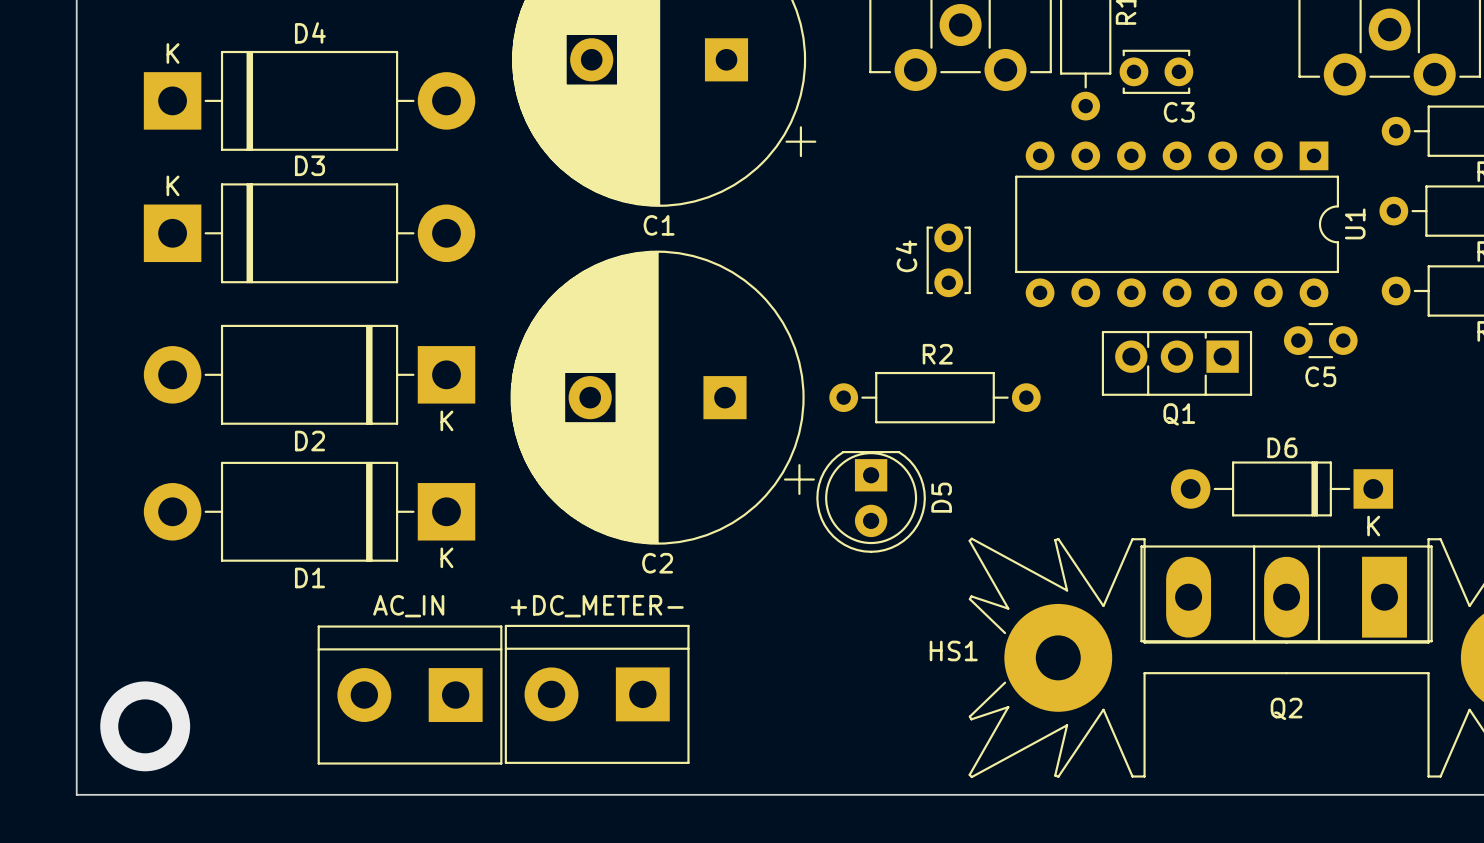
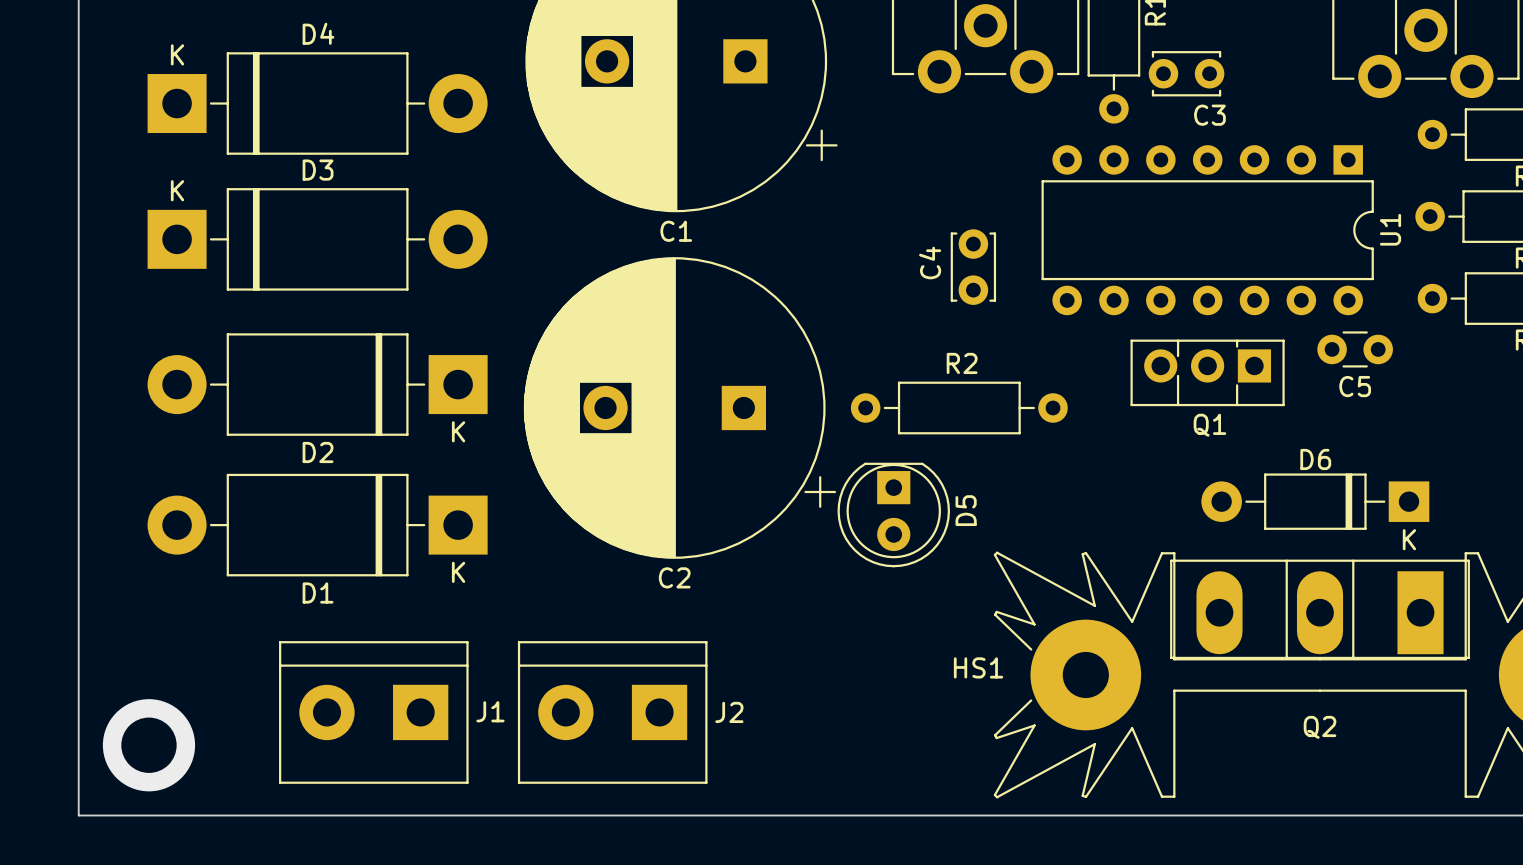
+DC_METER- name: +DC_METER- (597, 606) -> J2 (729, 712)
J1: none -> (373, 712)
AC_IN: (410, 695) -> none

